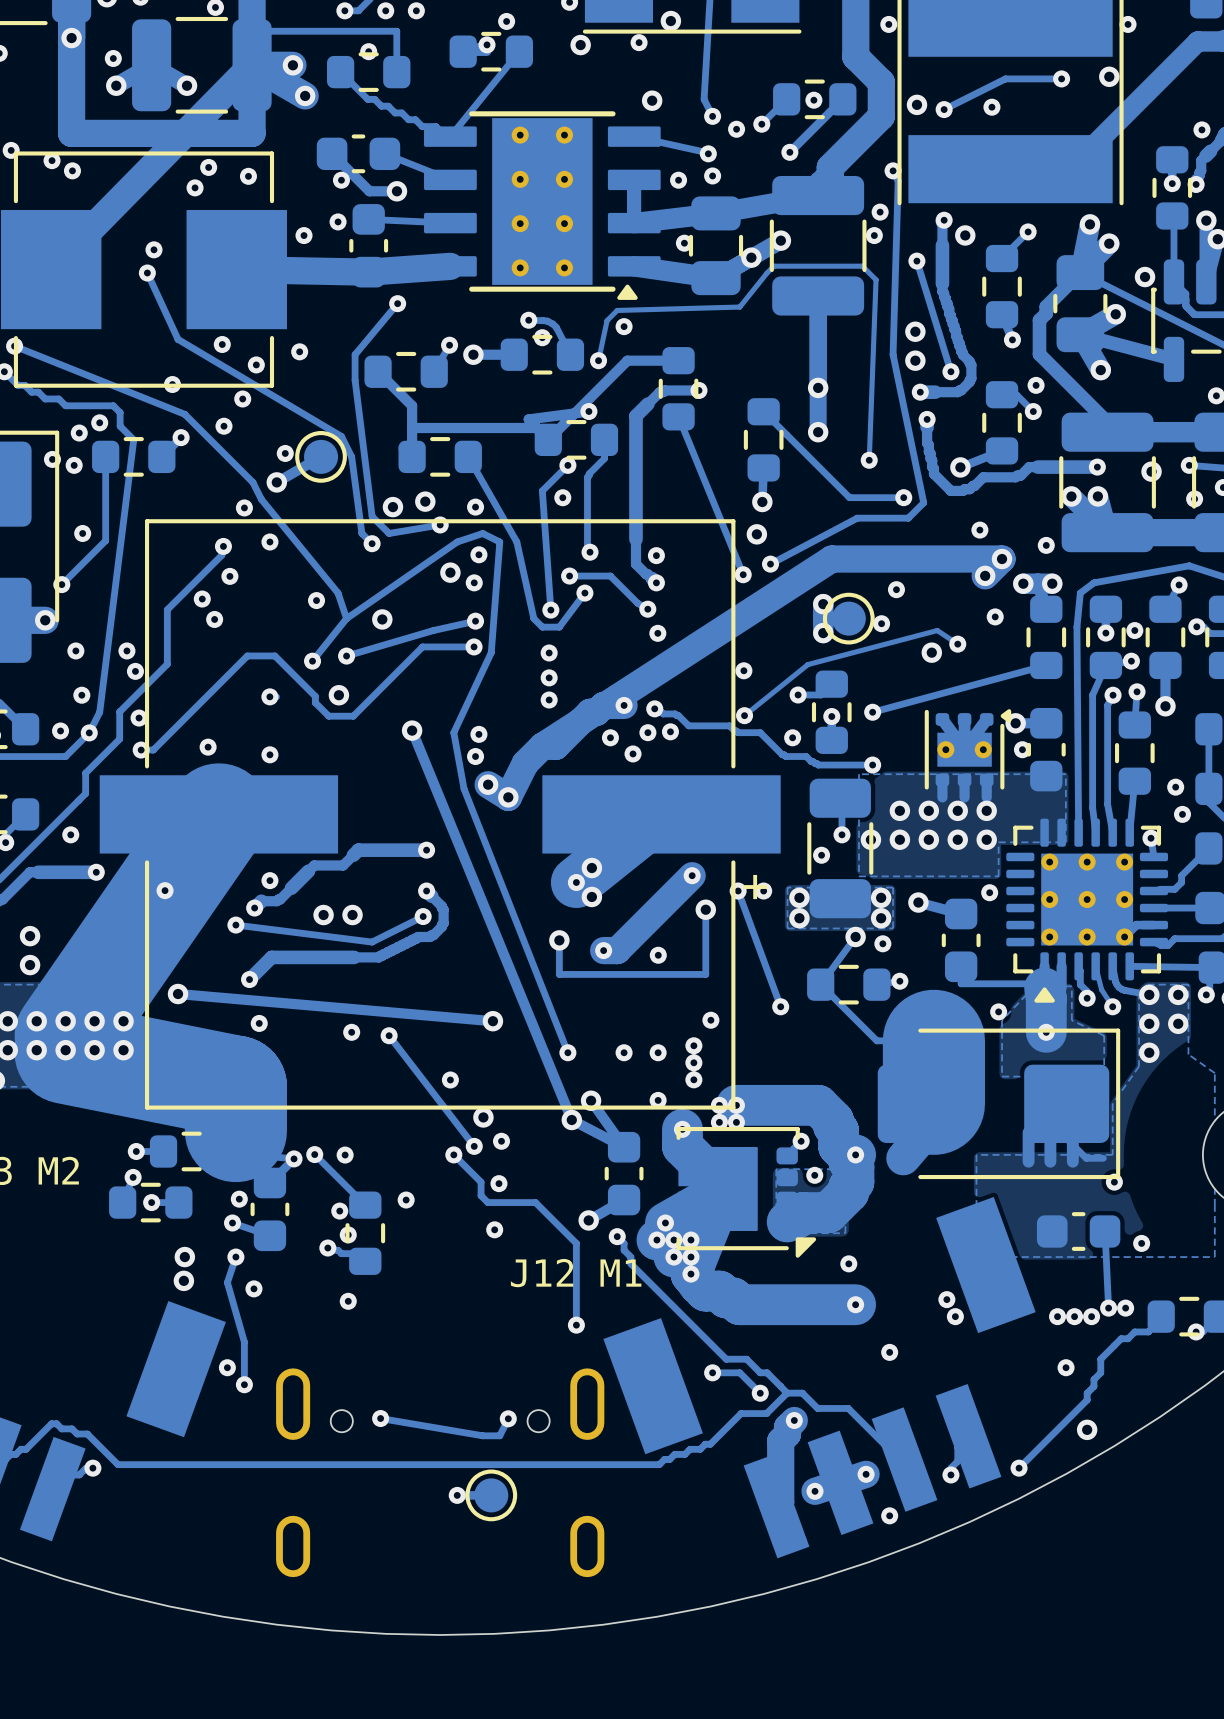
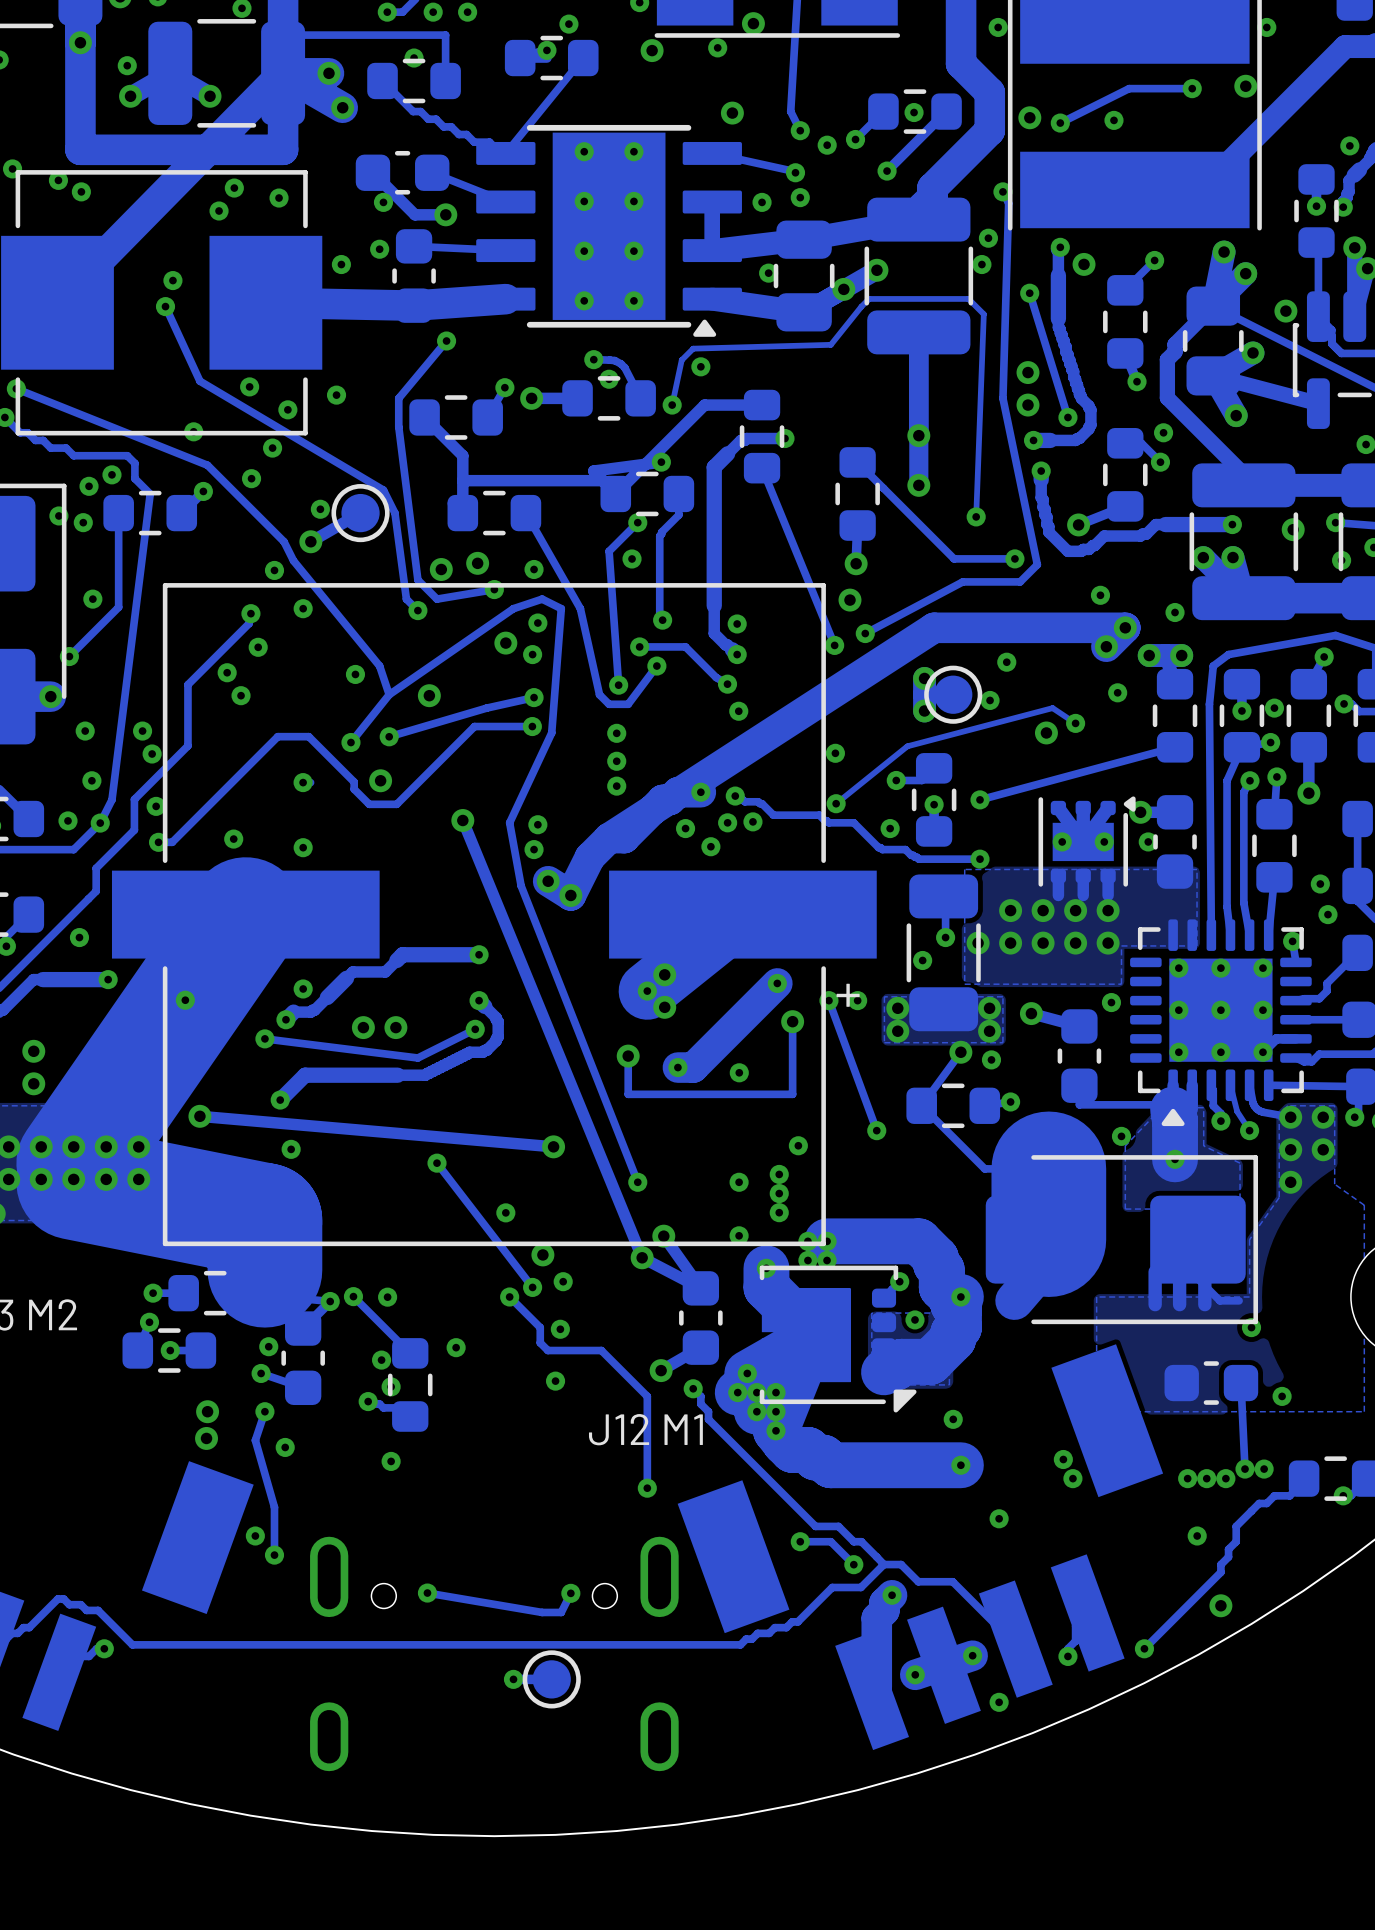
via: (351, 1032) -> none
via: (624, 1052) -> none

